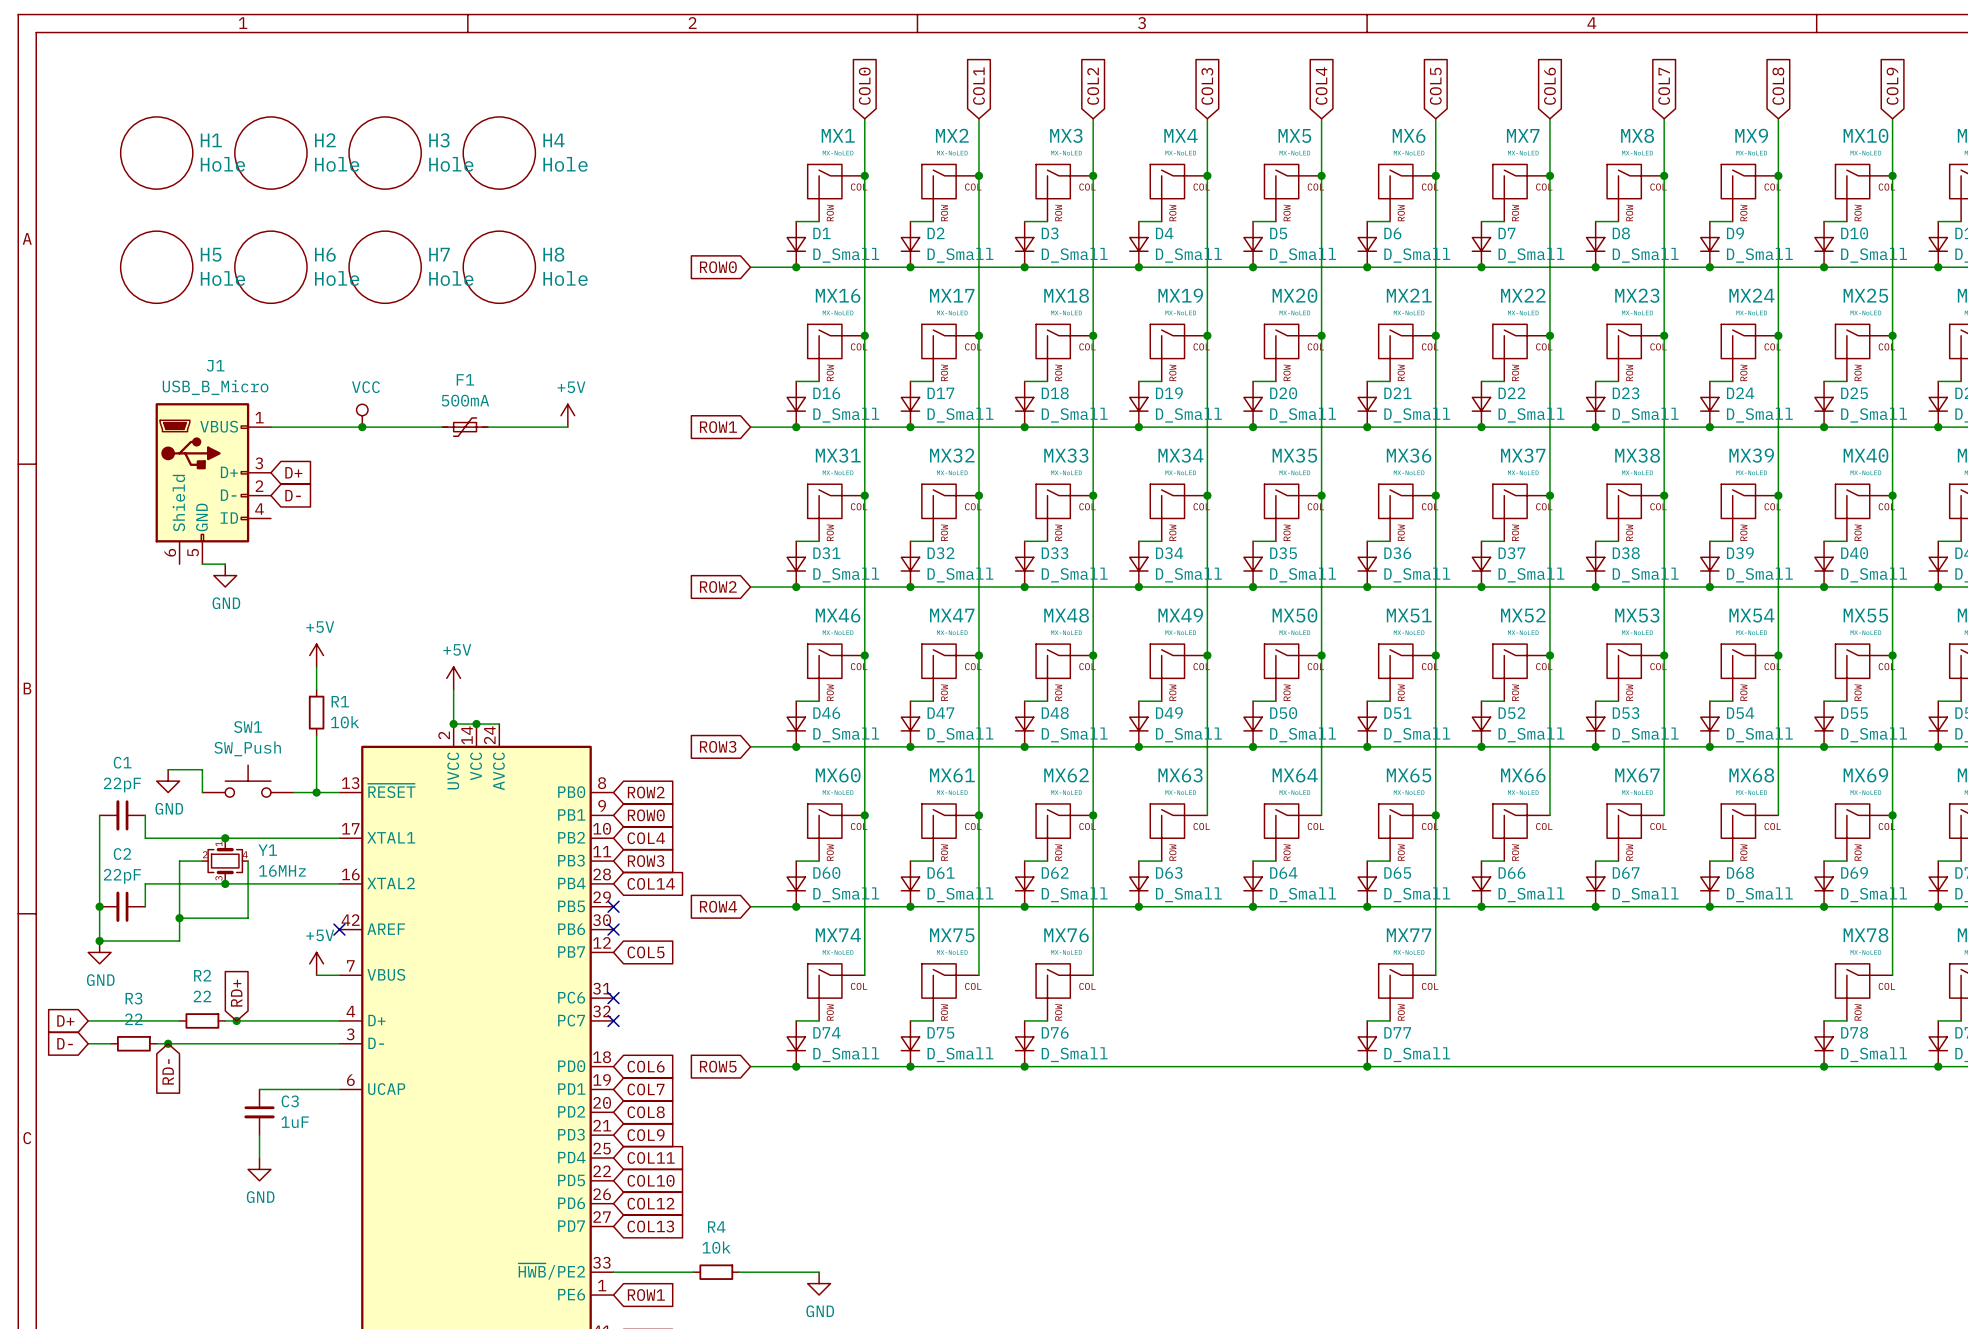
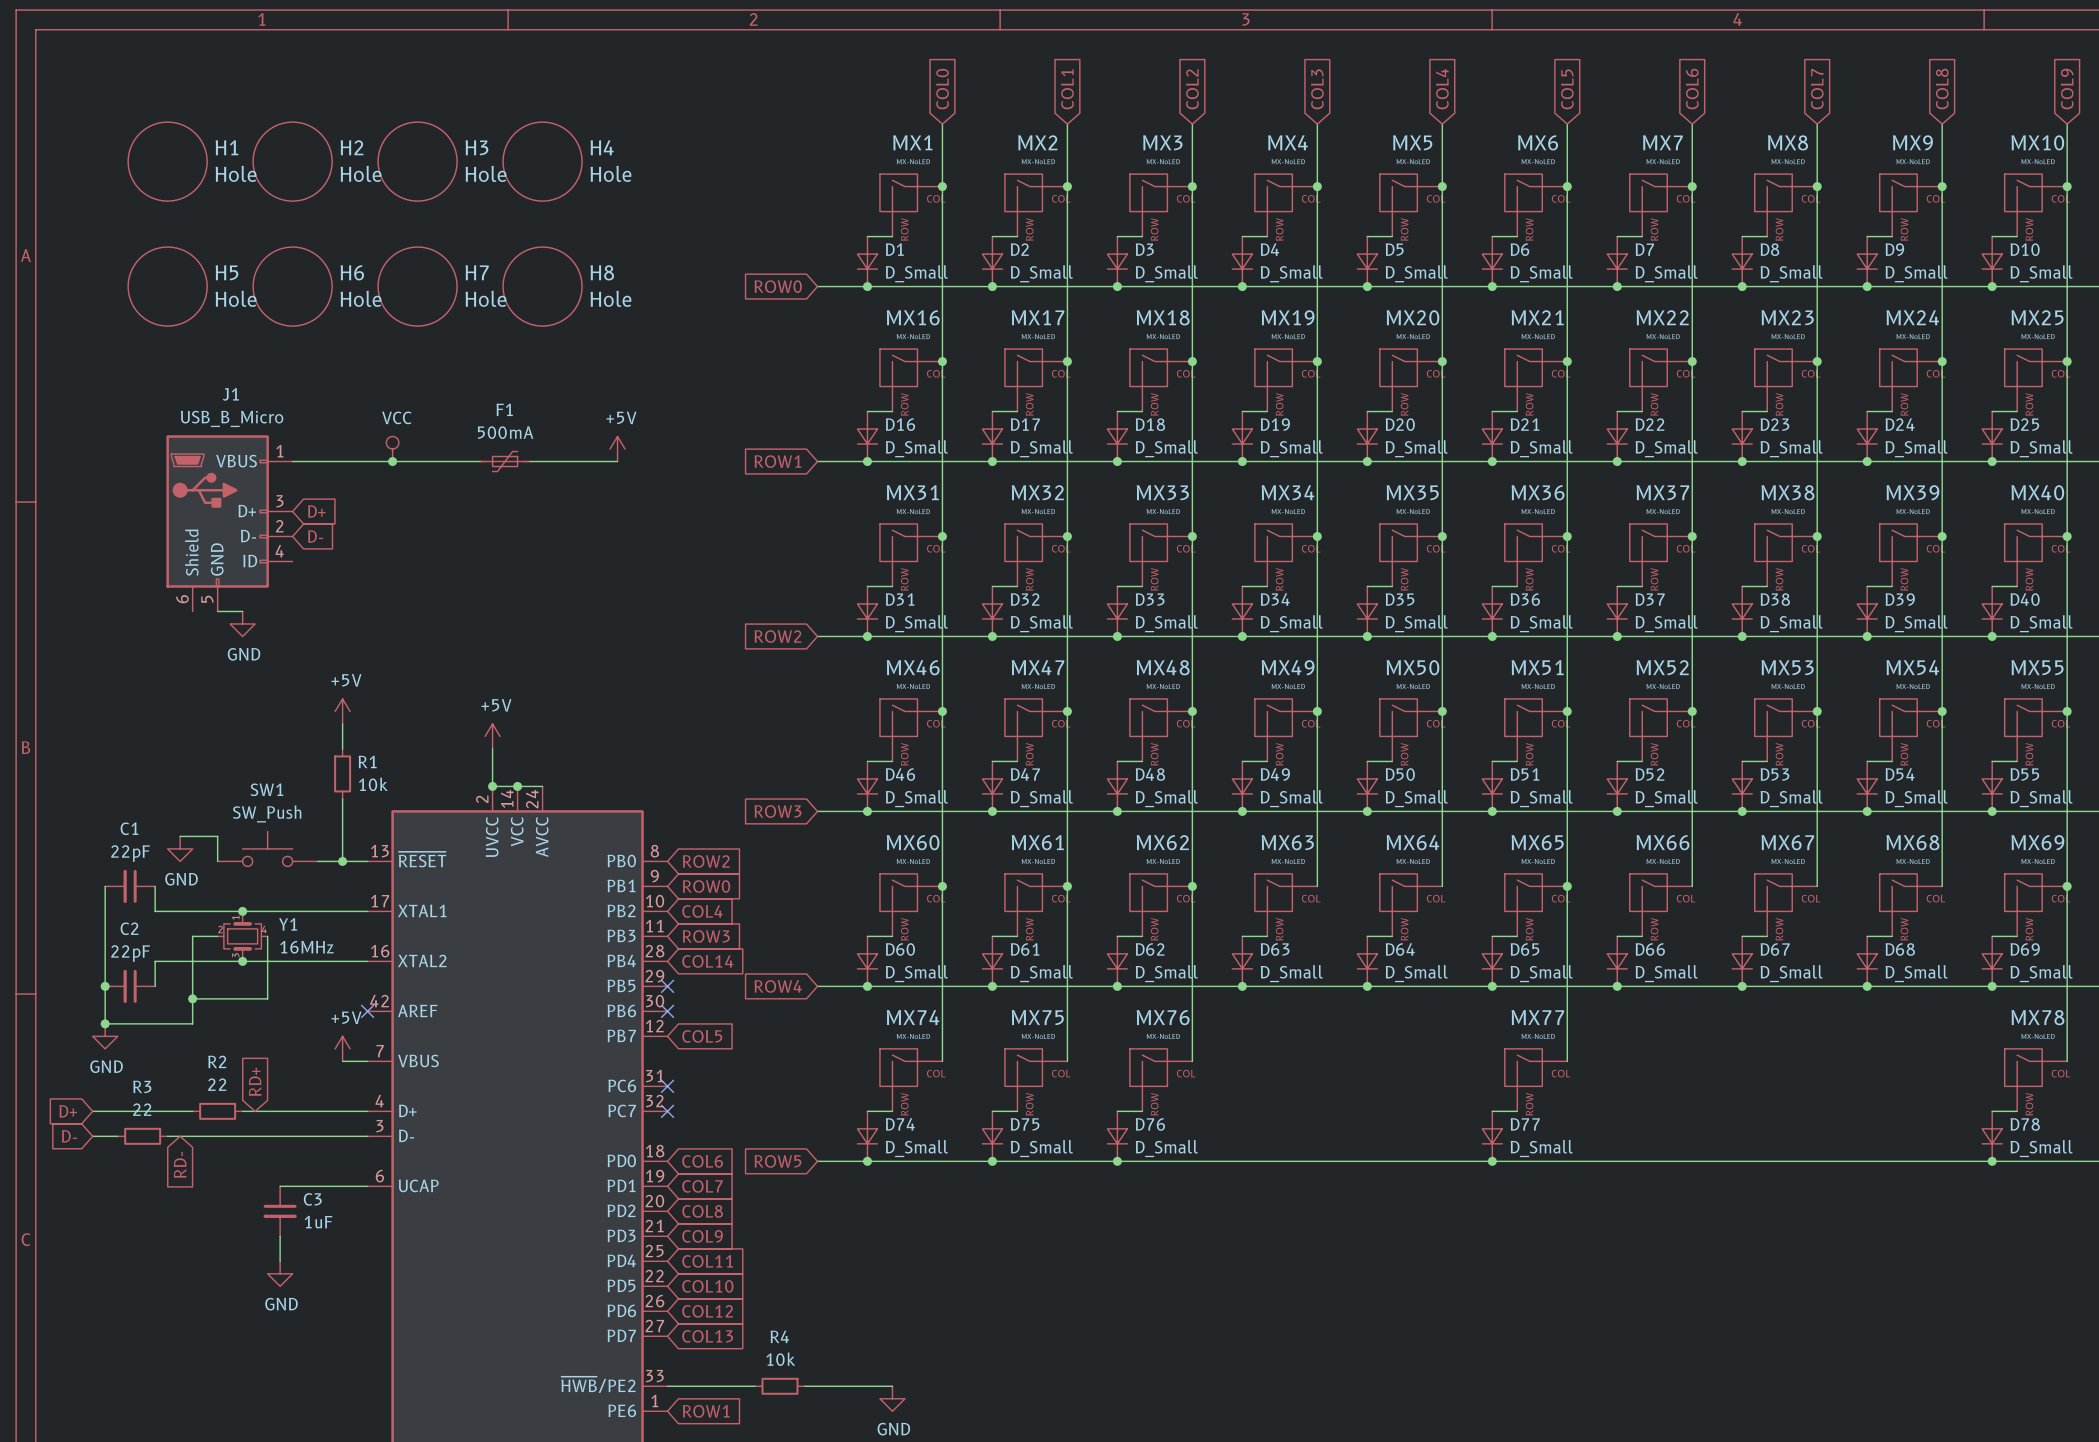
junction: (236, 1020) -> none
junction: (168, 1043) -> none

